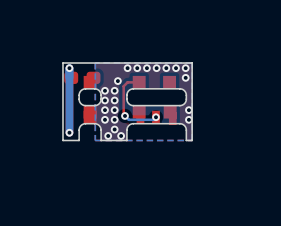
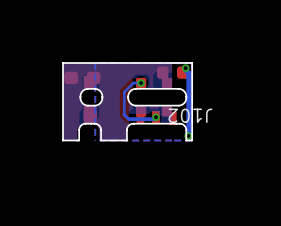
bottom track: (69, 68) (69, 132) -> none
via: (69, 68) -> none
via: (127, 68) -> none
via: (137, 68) -> none
via: (146, 68) -> none
via: (156, 68) -> none
via: (166, 68) -> none
via: (176, 68) -> none
bottom track: none -> (185, 70) (188, 73) (188, 136)
part footprint: [163, 75, 177, 89] -> [156, 66, 189, 79]
via: (185, 77) -> none
via: (117, 81) -> none
part: (139, 82) -> none
top track: (141, 82) (127, 82) (123, 86) (123, 114) -> none
bottom track: none -> (141, 83) (133, 83) (124, 92) (124, 114) (128, 118) (154, 118)
via: none -> (141, 83)
board edge: (94, 88) (84, 88) (80, 91) (79, 100) (81, 104) (95, 105) (99, 103) (100, 92) (94, 88) -> none
board edge: (179, 88) (131, 89) (127, 92) (127, 100) (132, 105) (181, 105) (185, 101) (186, 94) (184, 90) (179, 88) -> none
via: (104, 90) -> none
via: (114, 90) -> none
J102: none -> (133, 97)
via: (104, 100) -> none
via: (114, 100) -> none
via: (104, 110) -> none
via: (114, 110) -> none
via: (188, 110) -> none
part: (139, 112) -> none
part: (170, 112) -> none
via: (124, 115) -> none
via: (104, 119) -> none
via: (114, 119) -> none
via: (188, 119) -> none
via: (114, 129) -> none
via: (69, 132) -> none
via: (108, 135) -> none
via: (121, 135) -> none
via: none -> (188, 135)

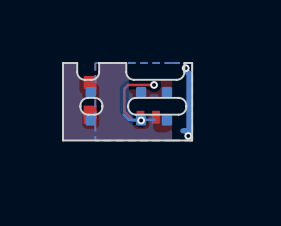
board edge: (99, 63) (77, 63) -> (99, 63) (98, 75) (91, 79) (82, 79) (78, 76) (77, 63)
board edge: (184, 63) (126, 63) -> (184, 63) (183, 75) (176, 79) (132, 79) (126, 75) (126, 63)
part: (172, 72) -> none
part: (82, 77) -> none
bottom track: (141, 83) (133, 83) (124, 92) (124, 114) (128, 118) (154, 118) -> none
via position: (141, 83) -> (154, 84)
top track: none -> (154, 84) (128, 84) (124, 88) (124, 111) (133, 120) (141, 120)
J102 side: bottom (133, 97) -> top (133, 106)
via position: (155, 117) -> (141, 120)
part: (172, 118) -> none
bottom track: none -> (182, 130) (186, 132)
board edge: (101, 140) (100, 127) (94, 123) (81, 125) (79, 140) -> (101, 140) (79, 140)
board edge: (186, 140) (185, 127) (179, 123) (131, 123) (127, 128) (126, 140) -> (186, 140) (126, 140)

